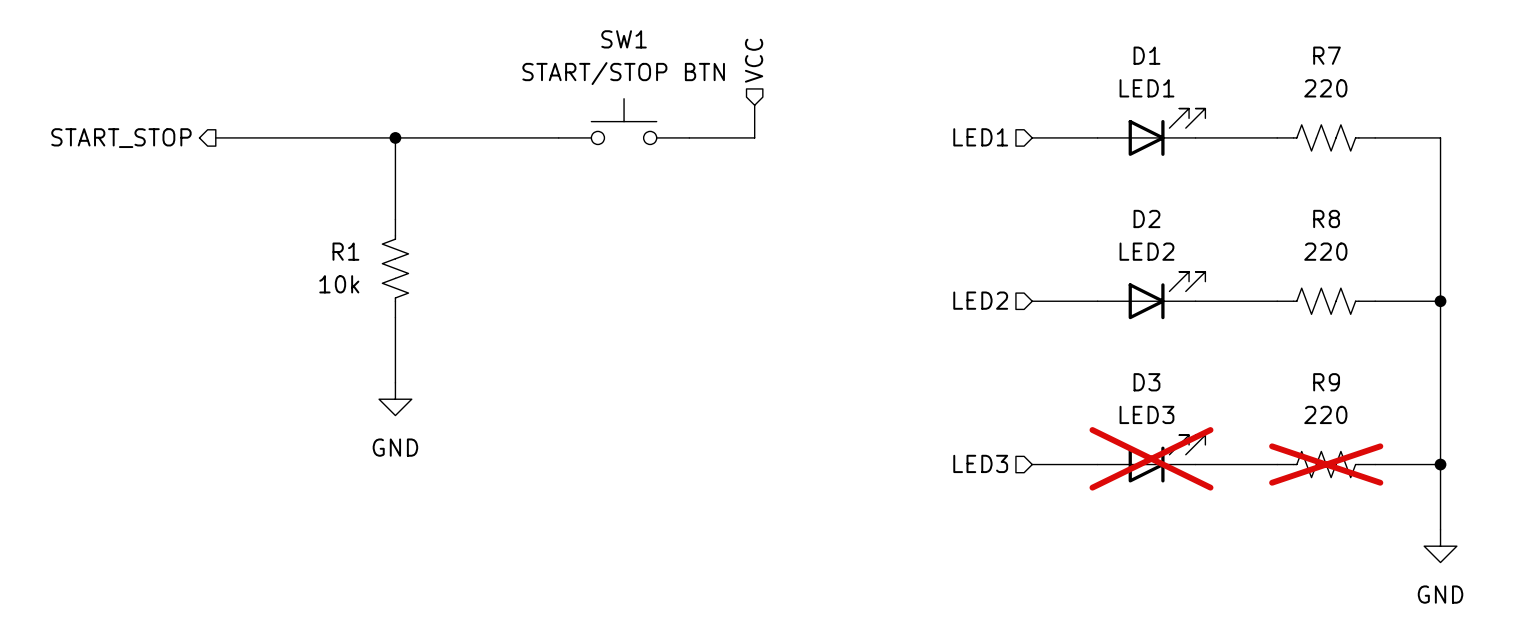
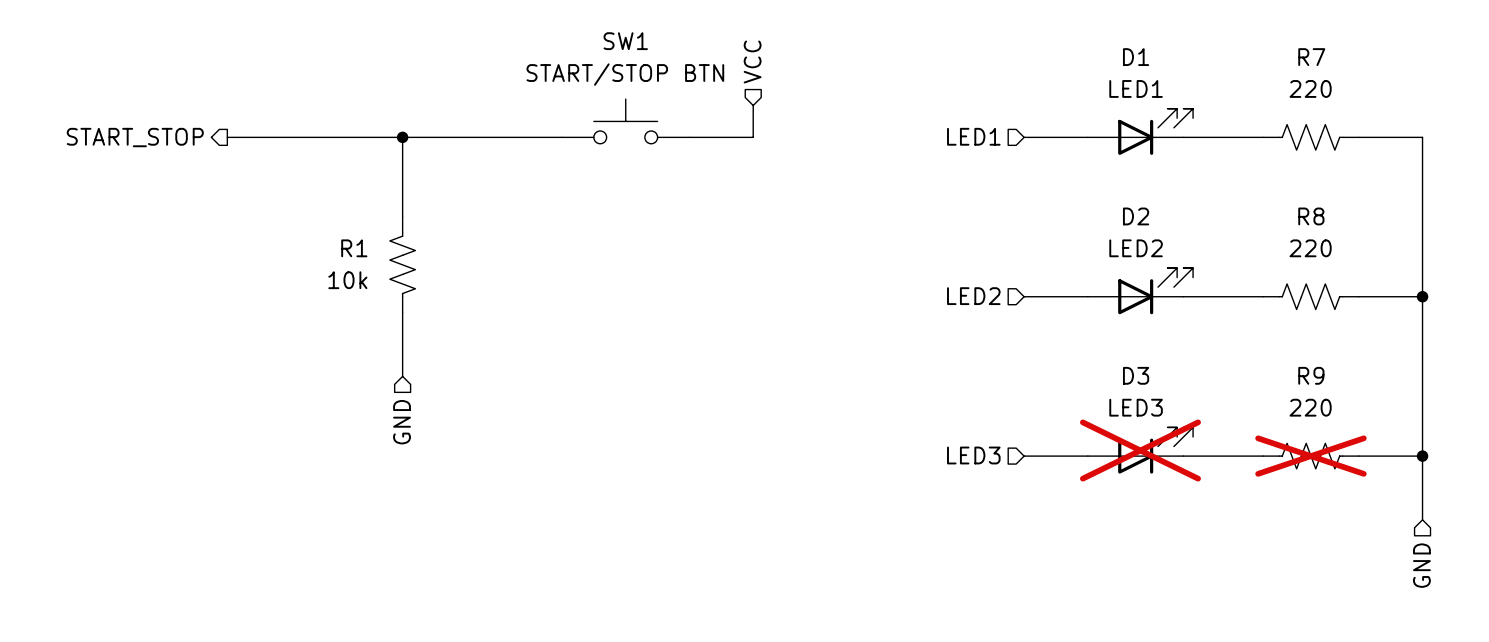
power symbol: GND (395, 399) -> none
hierarchical label: none -> GND (402, 422)
power symbol: GND (1440, 546) -> none
hierarchical label: none -> GND (1421, 565)

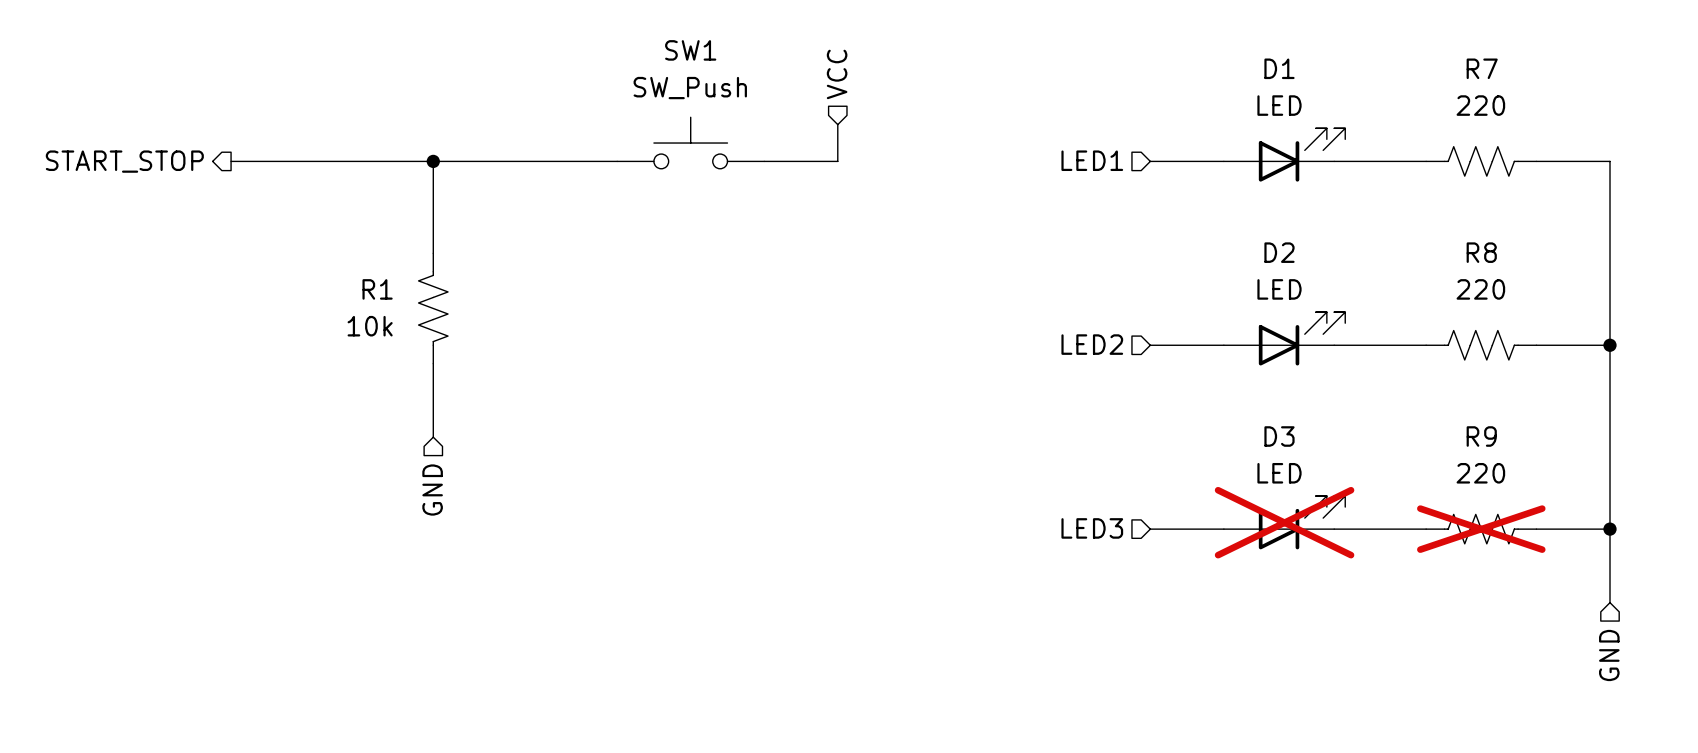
SW1 value: START/STOP BTN (625, 74) -> SW_Push (690, 88)
D1 value: LED1 (1136, 88) -> LED (1279, 105)
D2 value: LED2 (1136, 248) -> LED (1279, 289)
D3 value: LED3 (1136, 407) -> LED (1279, 473)

